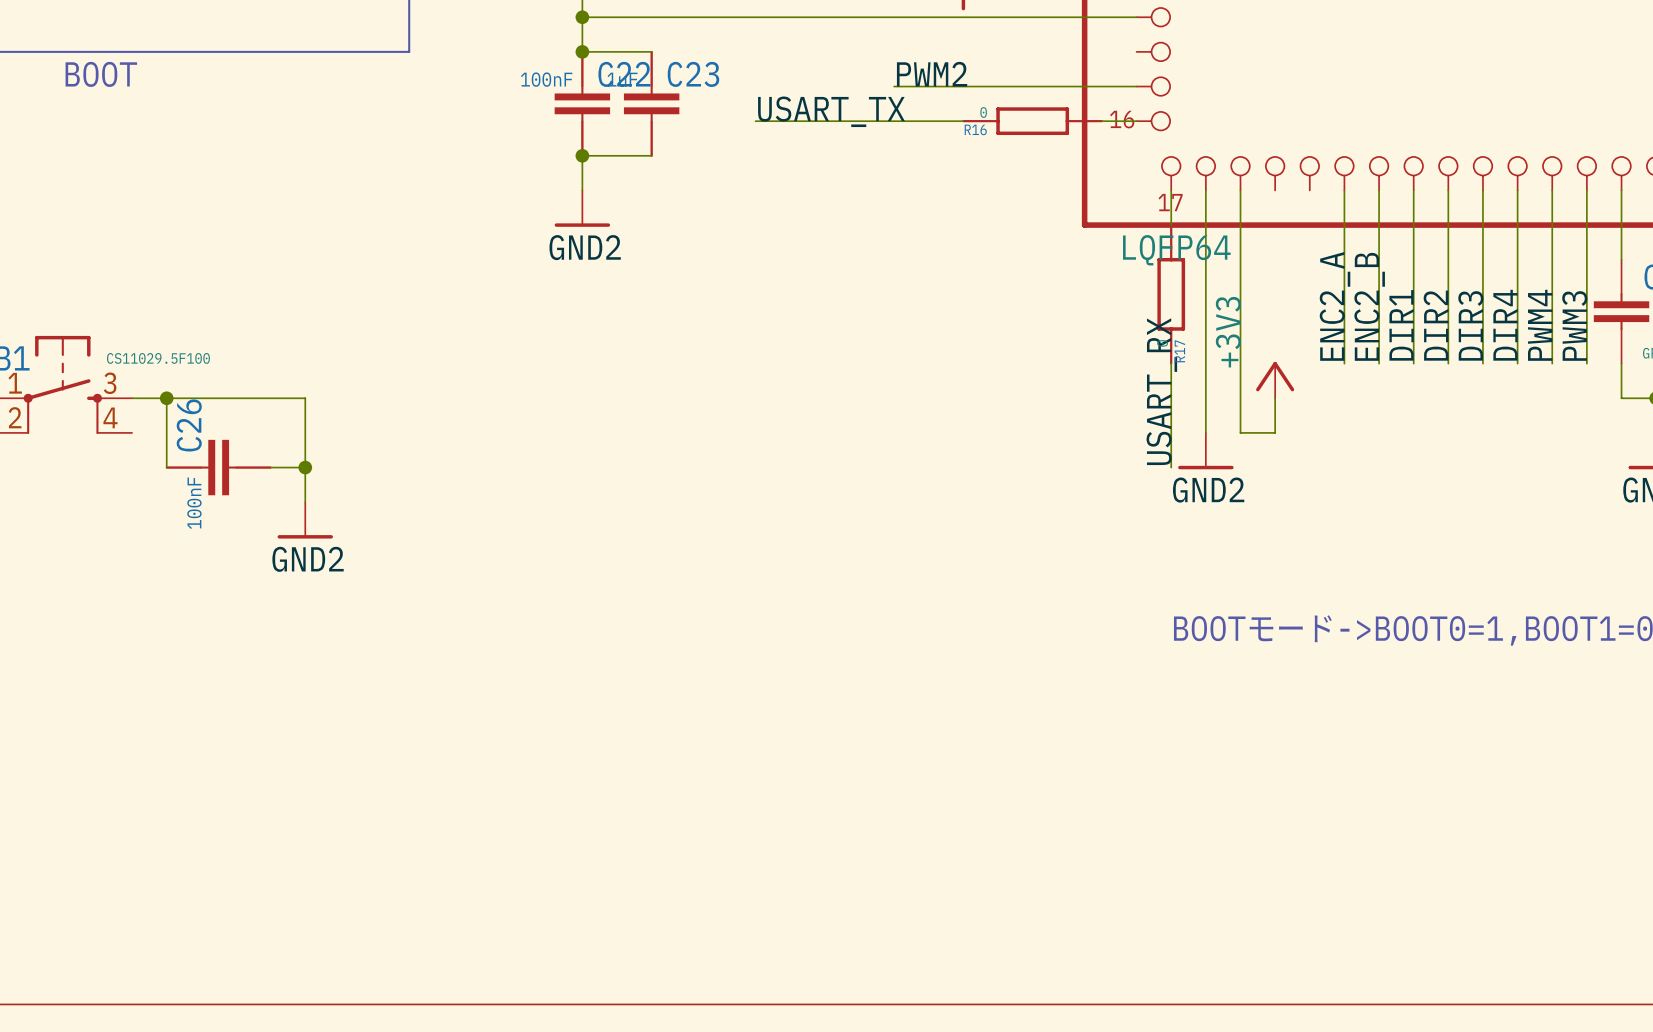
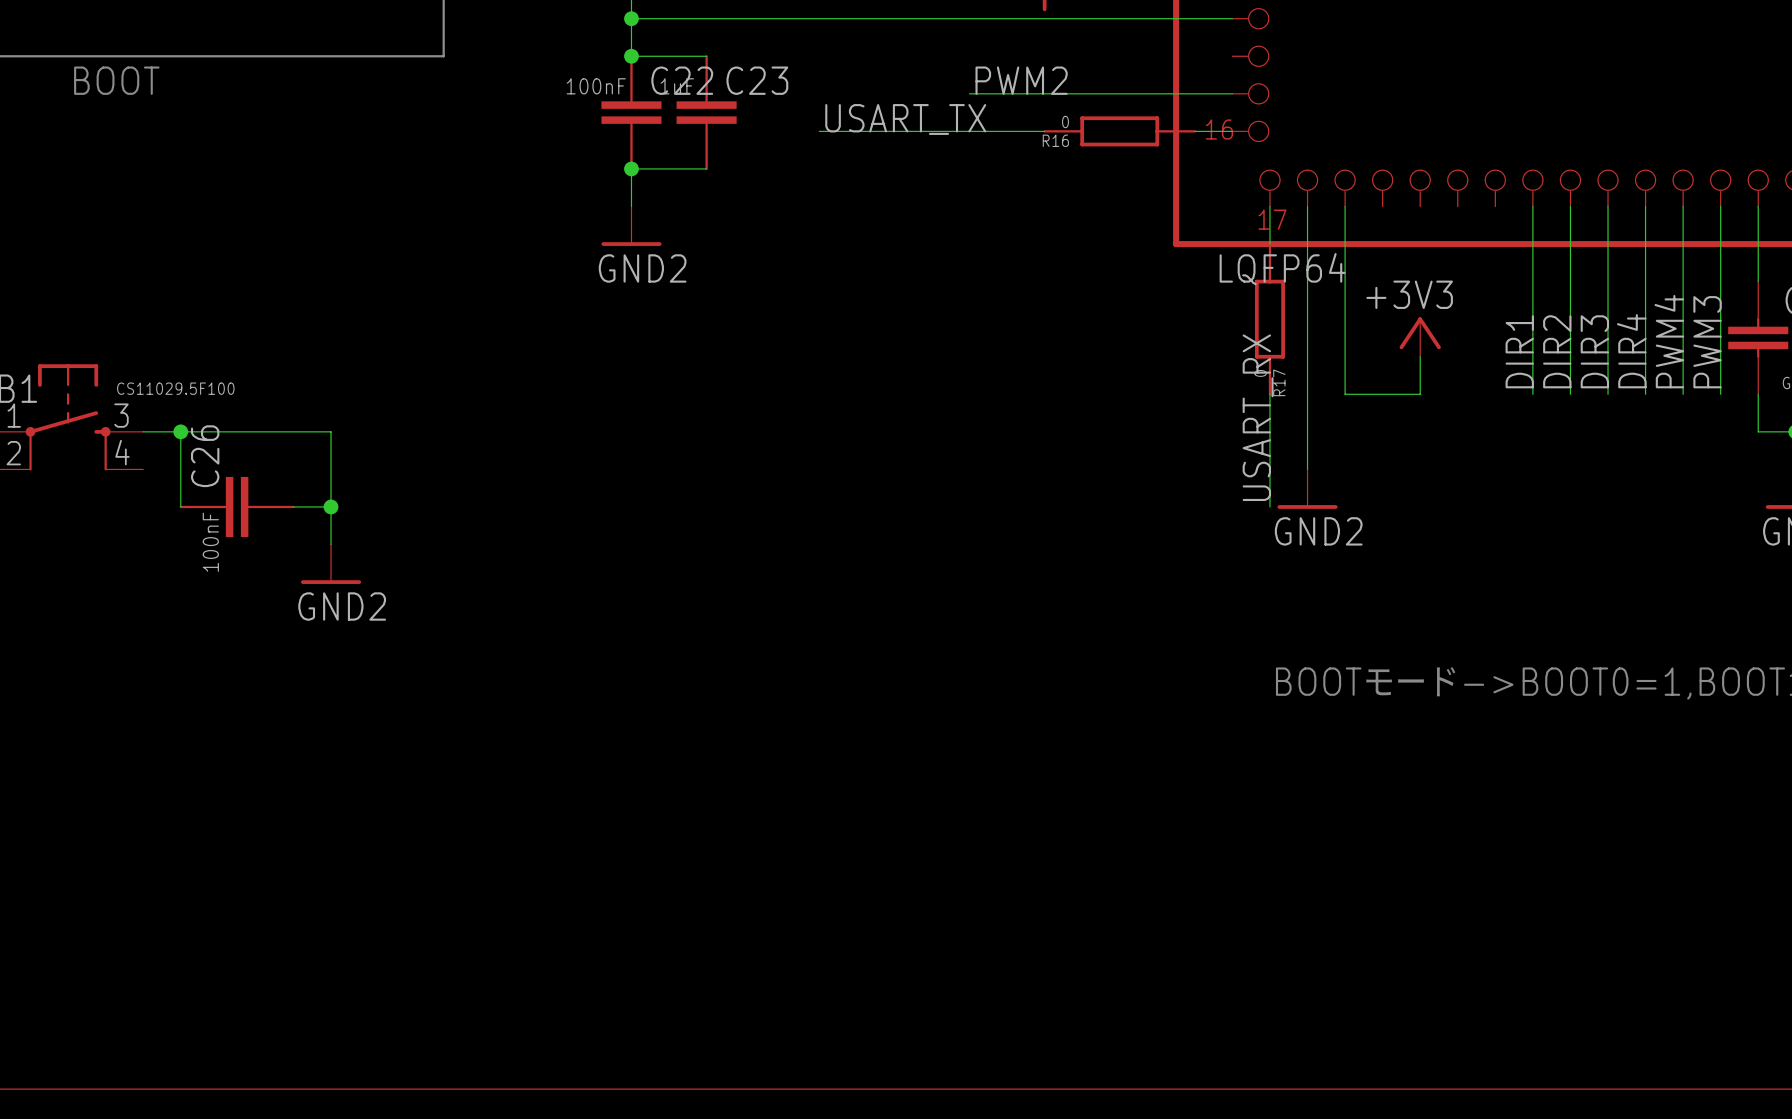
wire: (1344, 190) (1344, 363) -> none
wire: (1379, 190) (1379, 363) -> none
label: ENC2_A (1335, 306) -> none
label: ENC2_B (1369, 306) -> none
power symbol text rotation: 0° (1228, 332) -> 90° clockwise (1409, 294)
wire: (1240, 363) (1240, 432) (1275, 432) (1275, 398) -> (1345, 394) (1420, 394) (1420, 356)
power symbol position: +3V3 (1275, 380) -> +3V3 (1420, 337)

